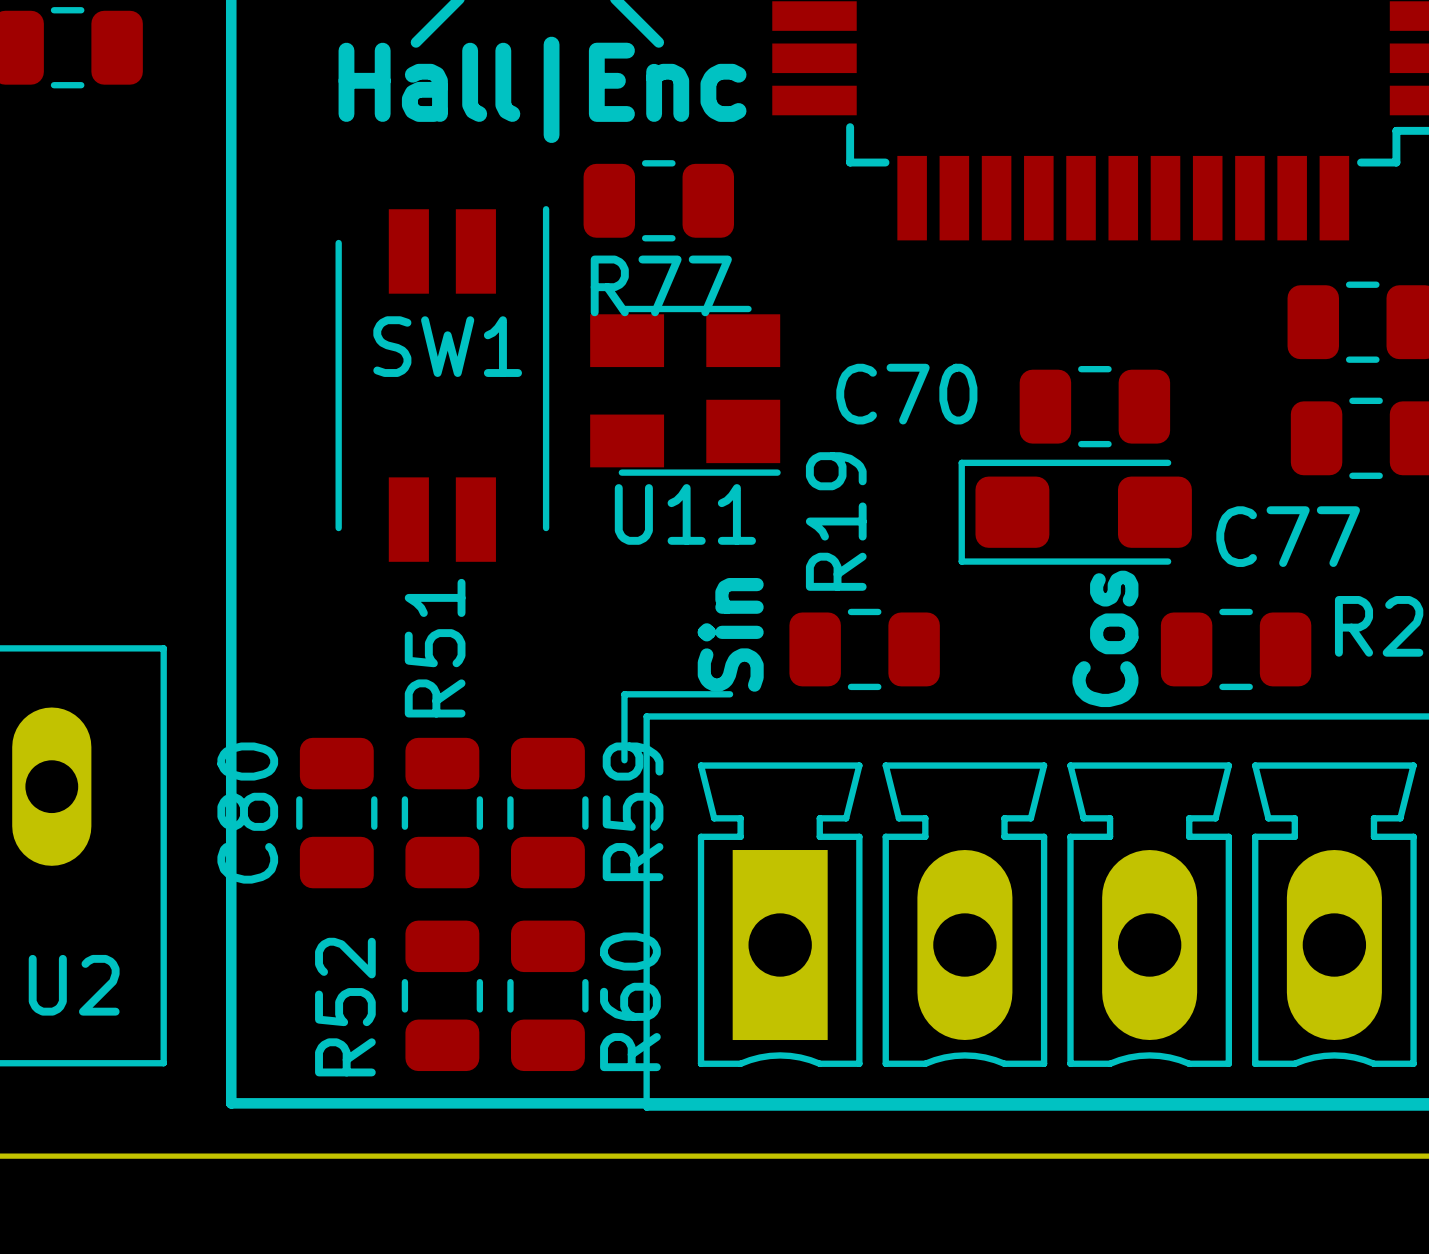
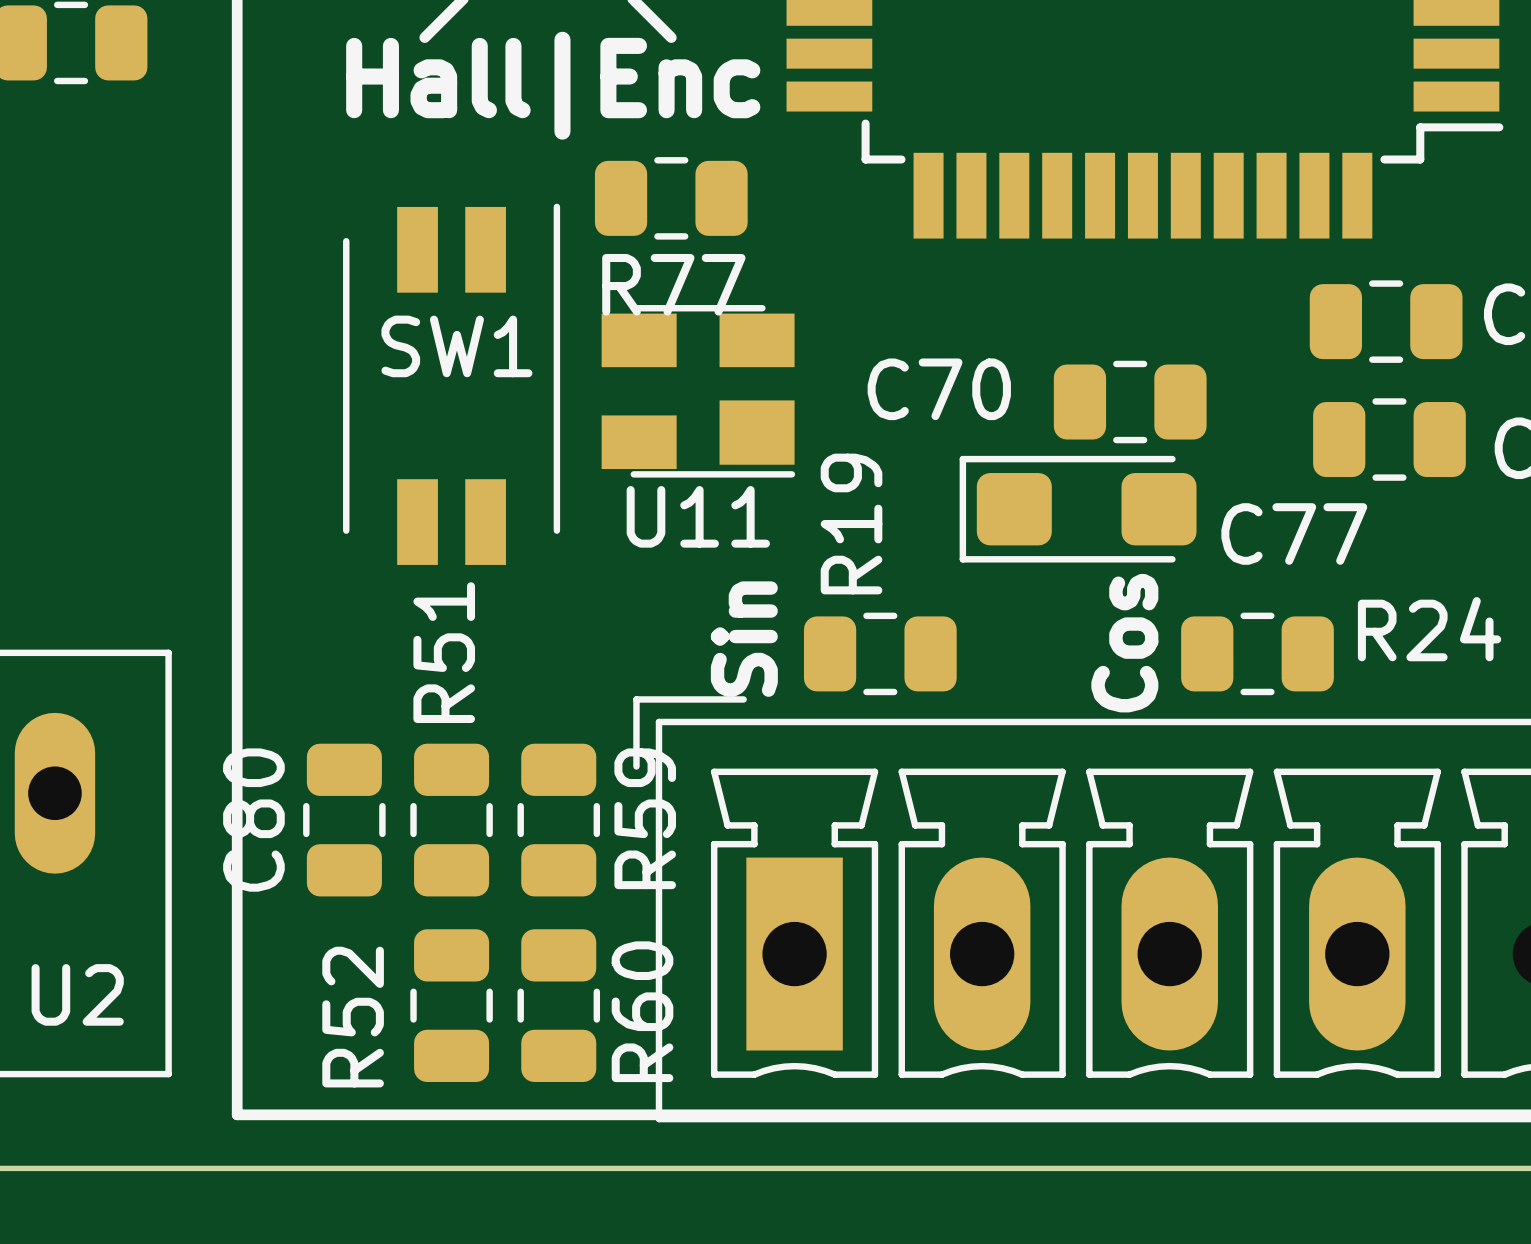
C70 position: (1094, 406) -> (1130, 402)
C77 position: (1075, 512) -> (1078, 509)

